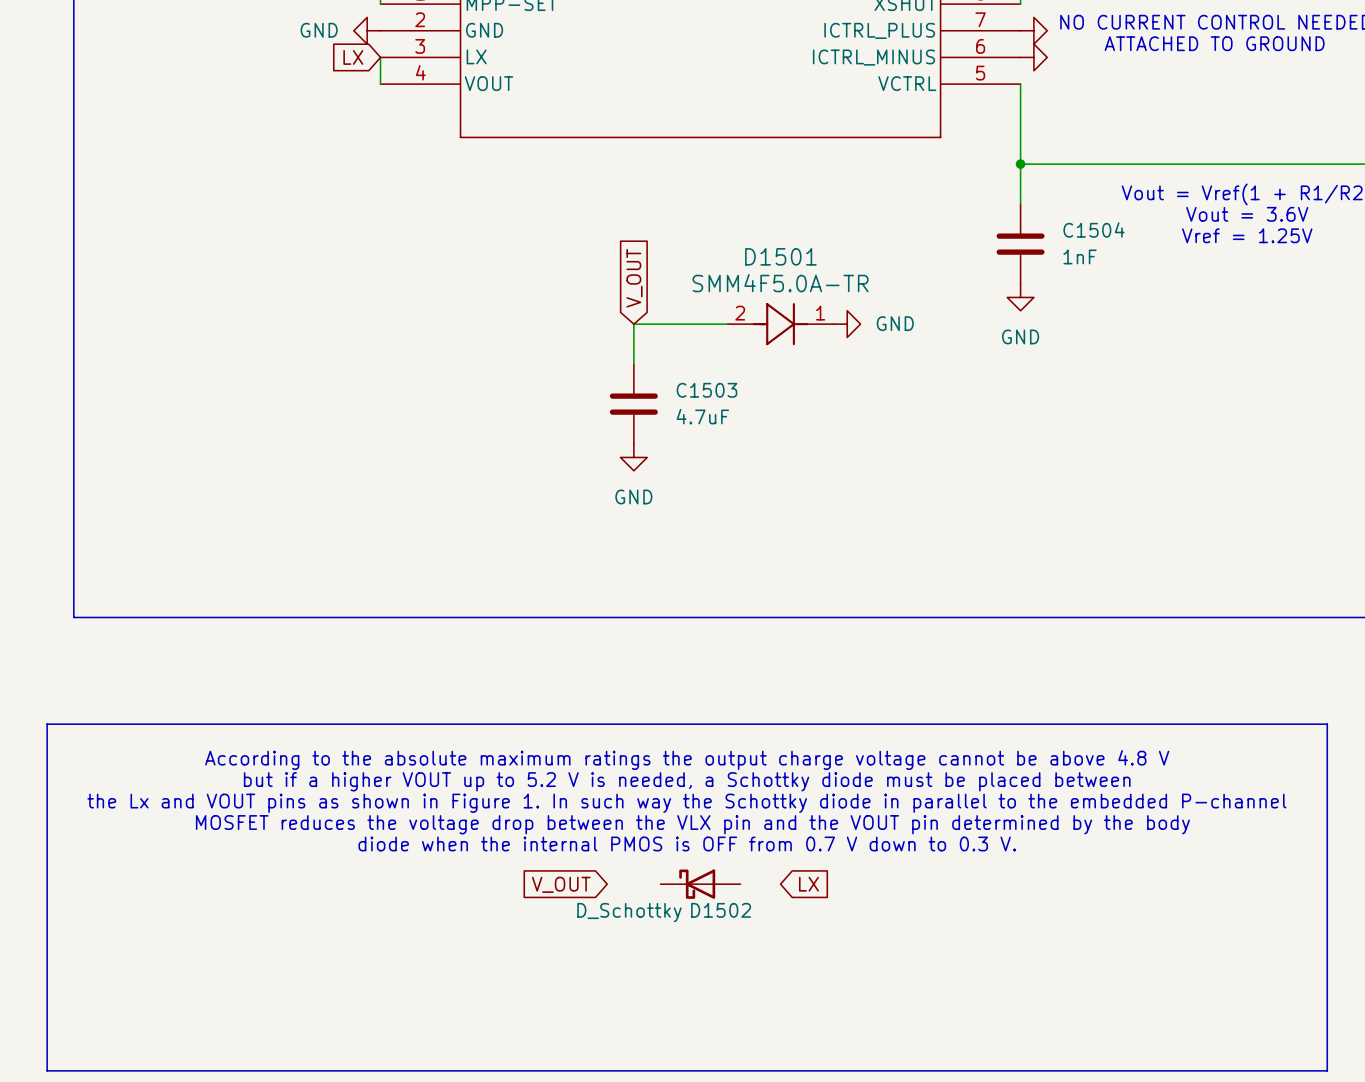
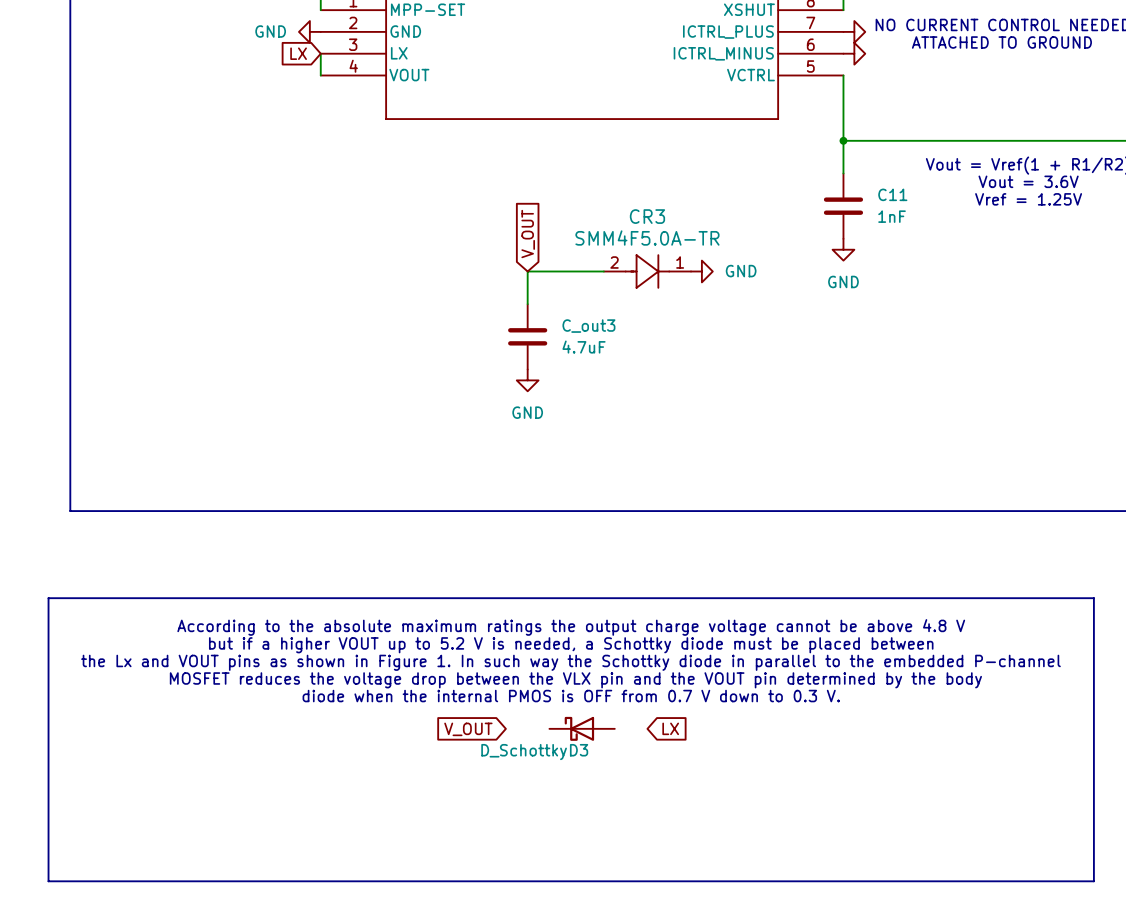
C1504 name: C1504 (1094, 229) -> C11 (892, 194)
D1501 name: D1501 (780, 256) -> CR3 (647, 216)
C1503 name: C1503 (706, 390) -> C_out3 (588, 326)
D1502 name: D1502 (721, 910) -> D3 (579, 750)

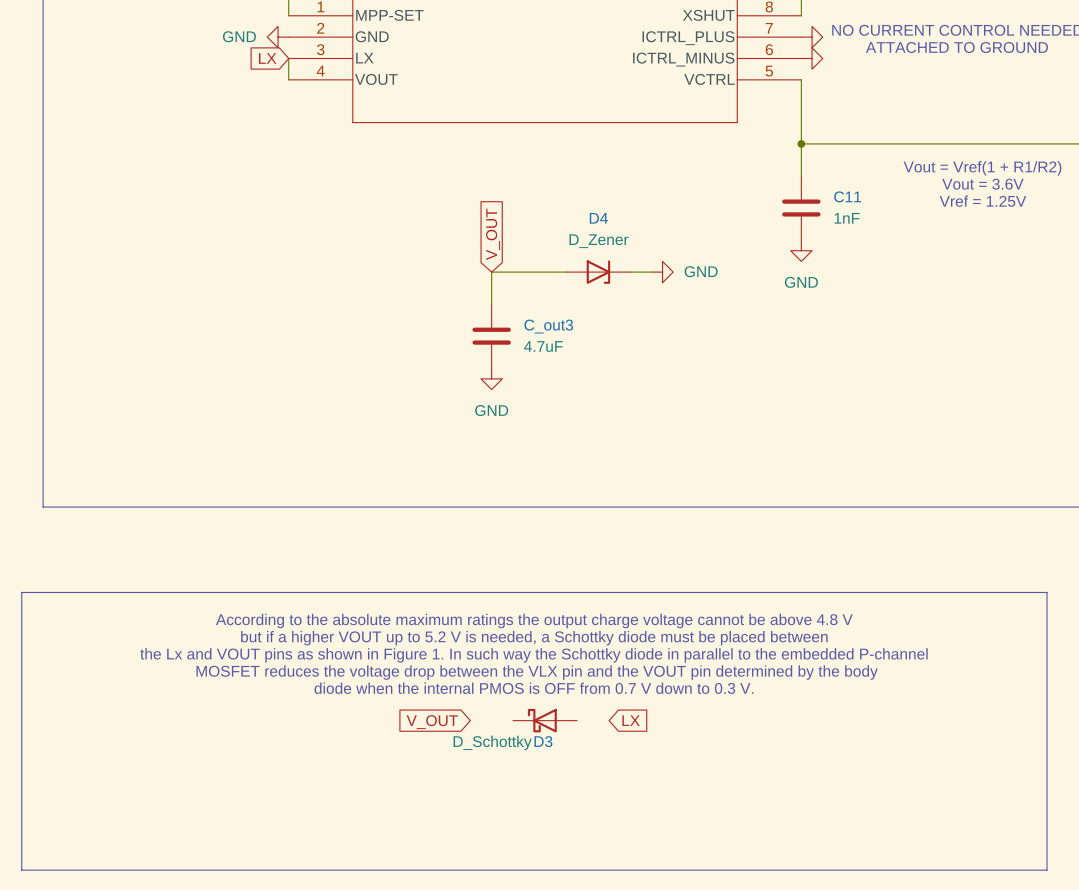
D4: none -> D_Zener (598, 272)
CR3: SMM4F5.0A-TR (647, 271) -> none

